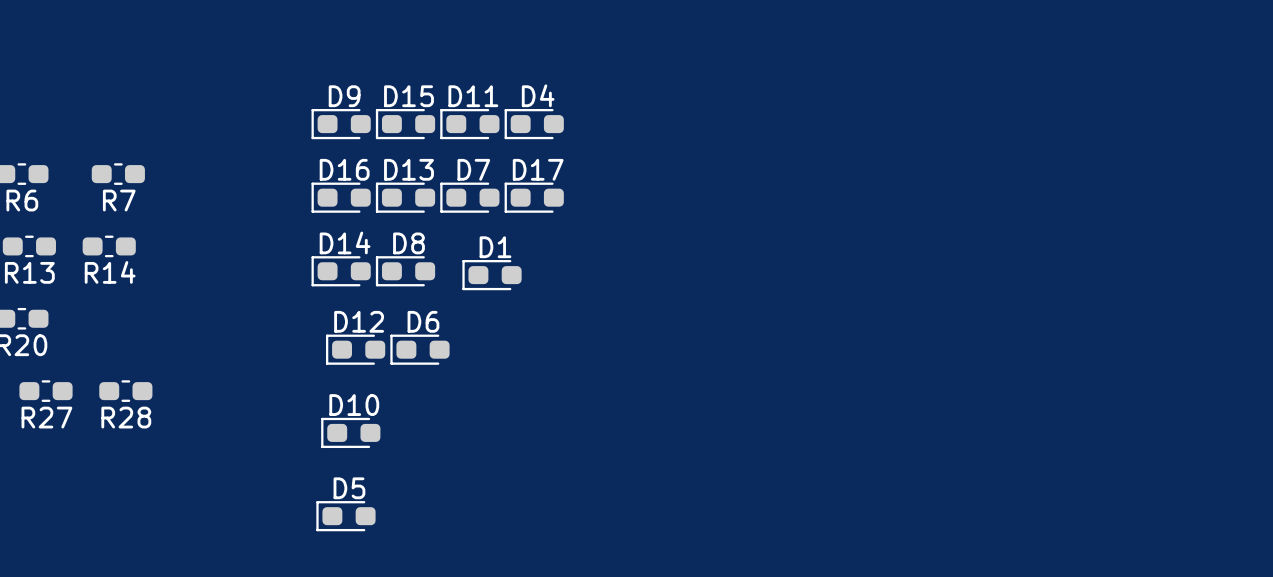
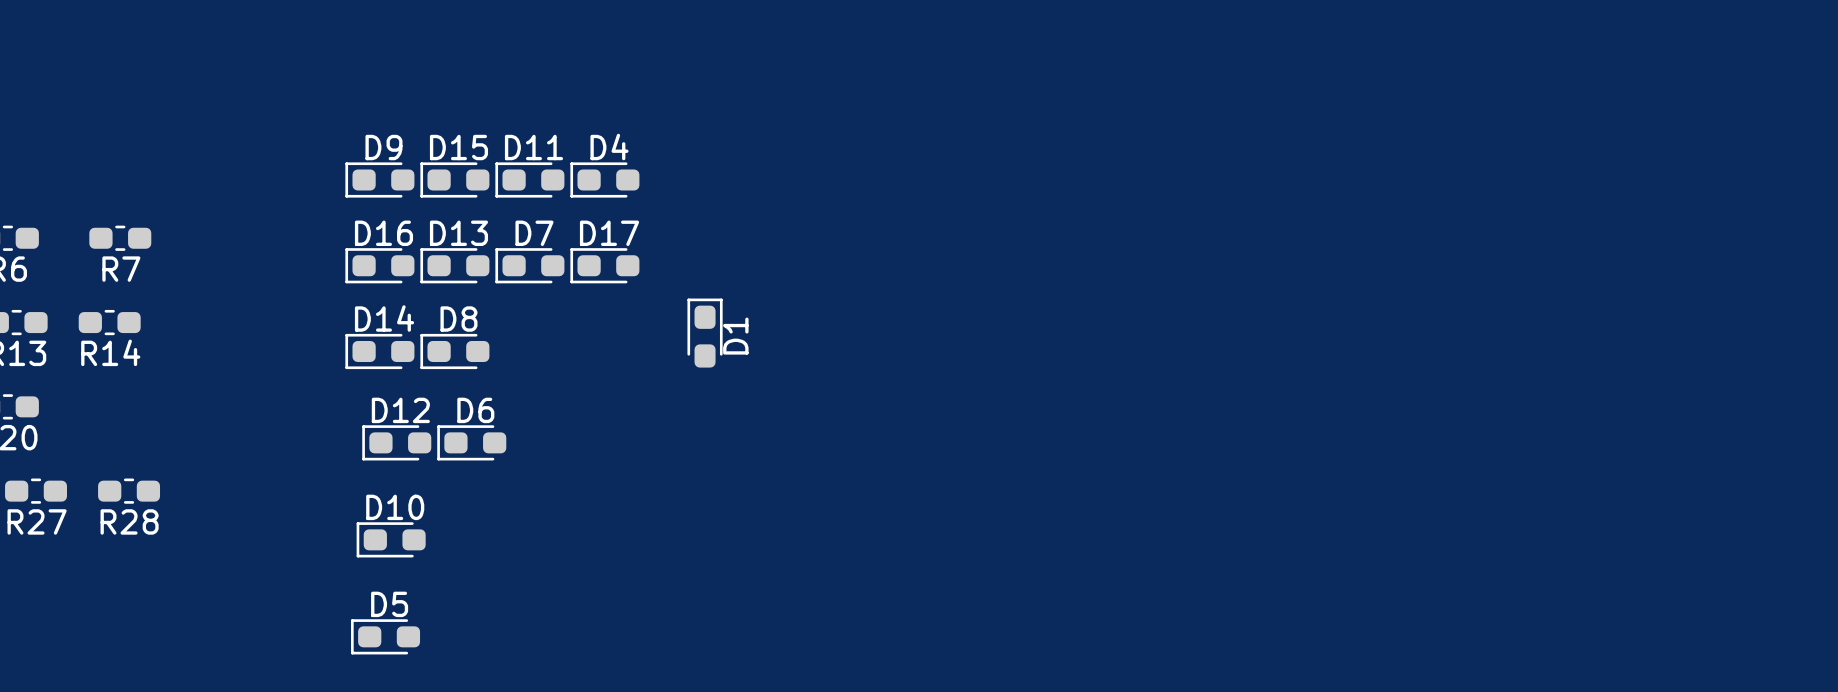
D1 rotation: 0° (492, 275) -> 90° clockwise (705, 333)
D1 position: (492, 275) -> (705, 333)

